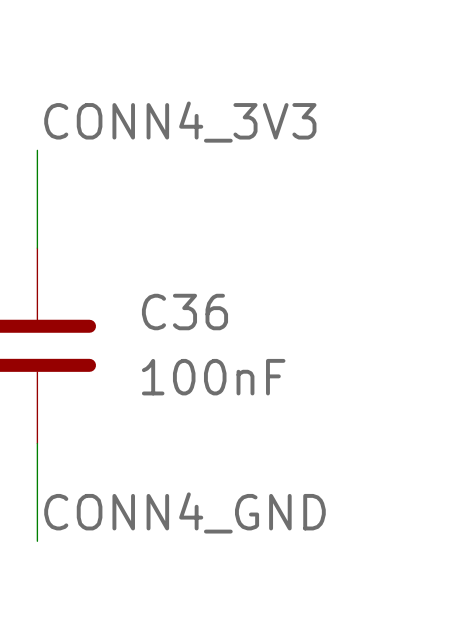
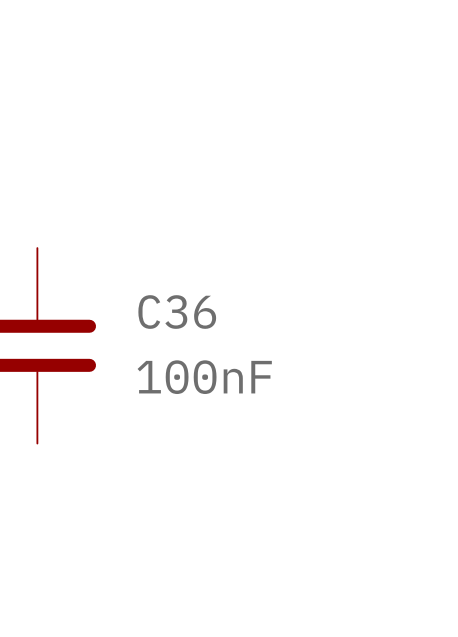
label: CONN4_3V3 (180, 122) -> none
wire: (37, 150) (37, 248) -> none
wire: (37, 443) (37, 541) -> none
label: CONN4_GND (184, 512) -> none

